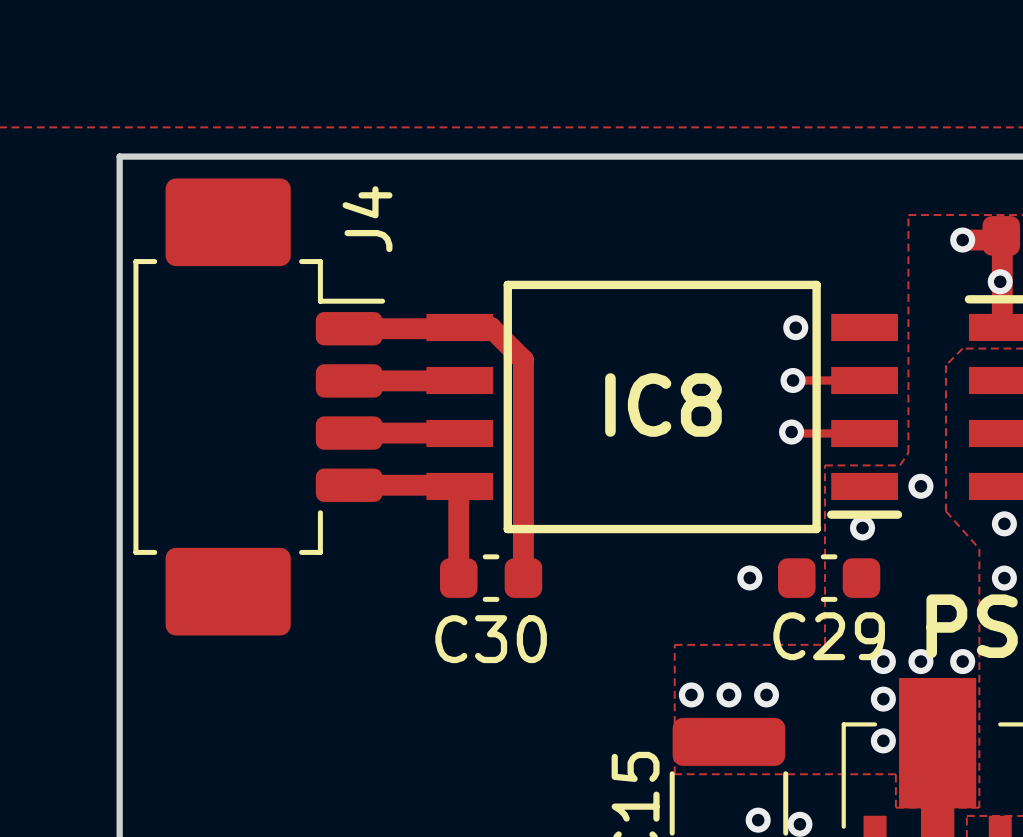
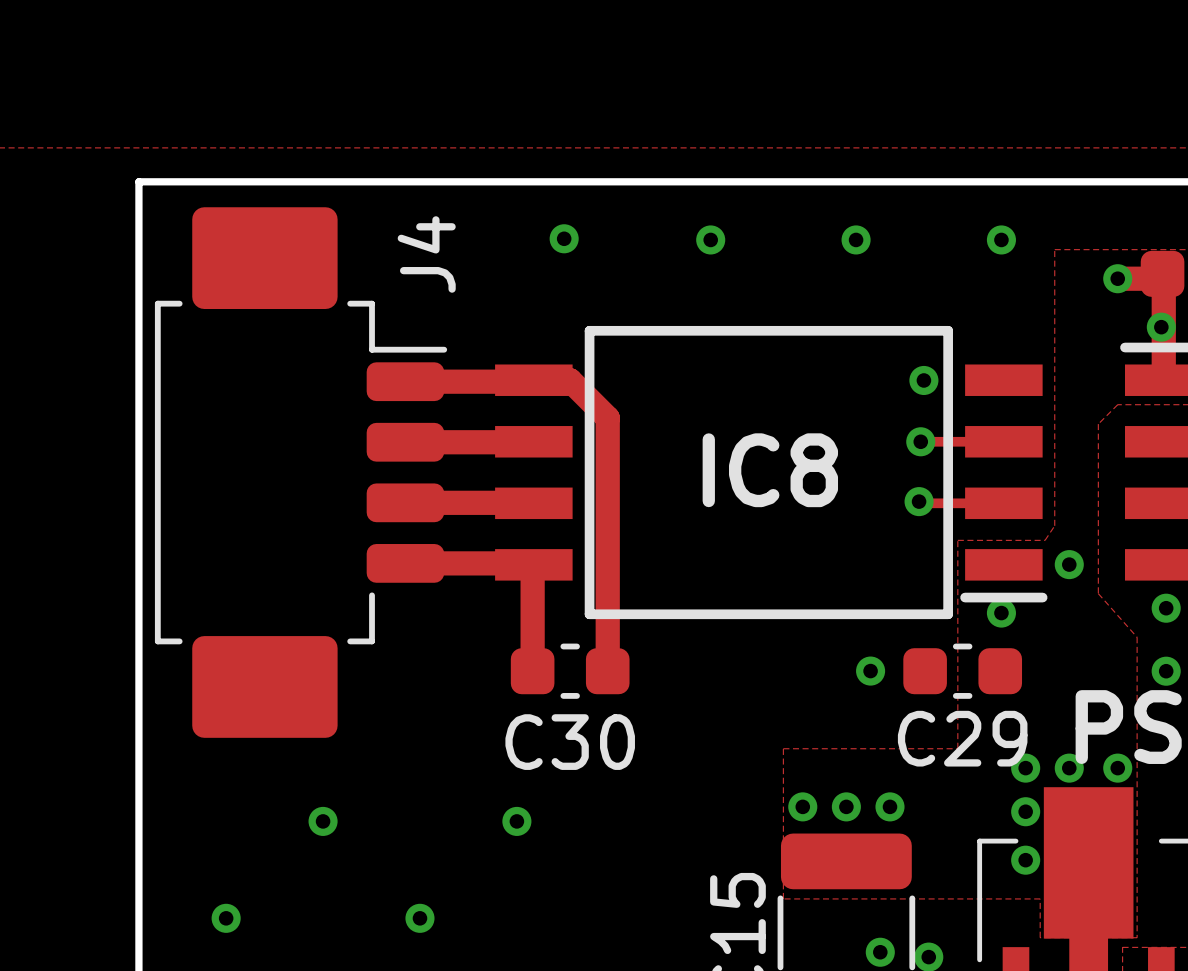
via: none -> (564, 238)
via: none -> (710, 239)
via: none -> (856, 239)
via: none -> (1001, 239)
via: none -> (323, 821)
via: none -> (516, 821)
via: none -> (226, 918)
via: none -> (419, 918)

